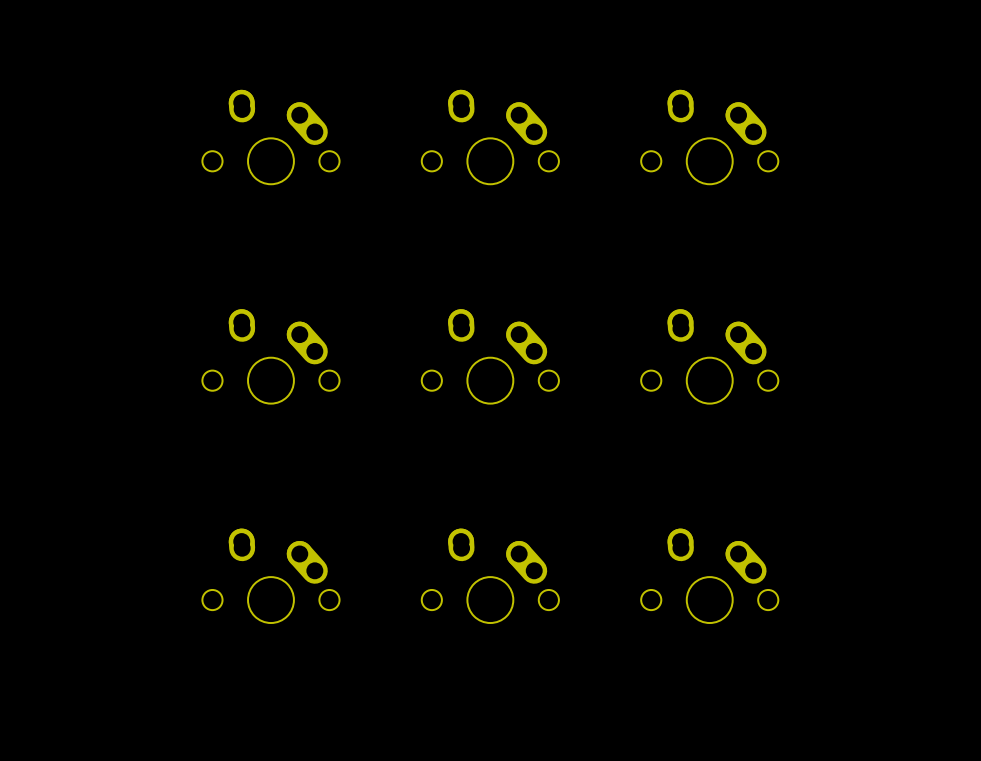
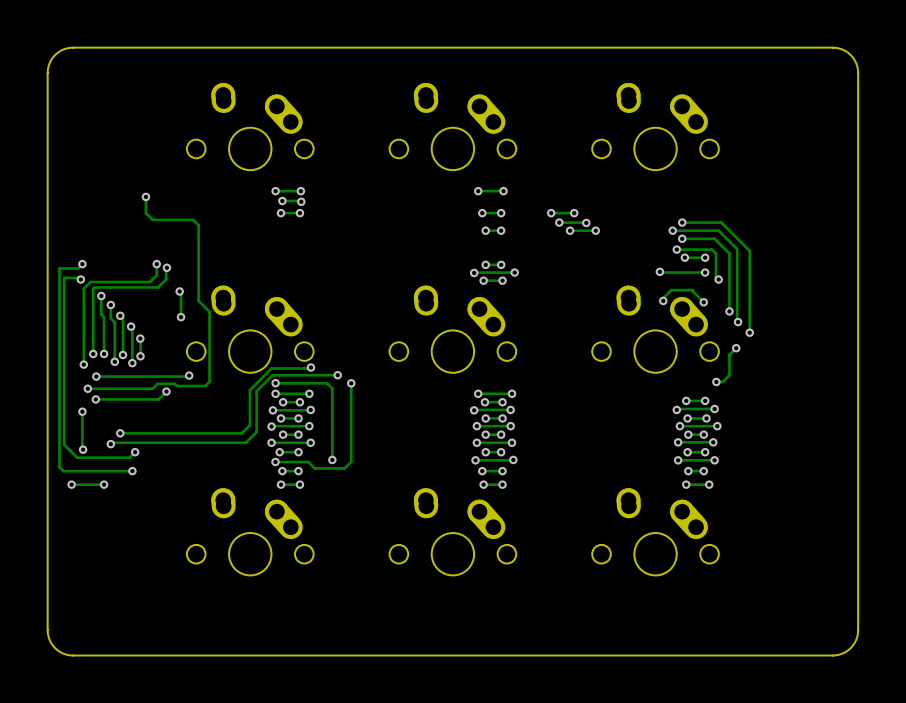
board edge: none -> (832, 47) (72, 47) (57, 52) (49, 63) (47, 72) (47, 630) (52, 645) (60, 652) (72, 655) (832, 655) (848, 650) (856, 639) (858, 630) (858, 72) (856, 63) (850, 55) (842, 49) (832, 47)
via: none -> (275, 191)
track: none -> (300, 191) (275, 191)
via: none -> (300, 191)
via: none -> (478, 191)
track: none -> (503, 191) (478, 191)
via: none -> (503, 191)
track: none -> (145, 196) (145, 213) (152, 219) (193, 219) (198, 225) (198, 300) (209, 311) (209, 381) (205, 386) (157, 383) (152, 388) (87, 388)
via: none -> (145, 196)
track: none -> (282, 200) (301, 201)
via: none -> (282, 200)
via: none -> (301, 201)
via: none -> (281, 213)
track: none -> (299, 213) (281, 213)
via: none -> (299, 213)
via: none -> (482, 213)
track: none -> (501, 213) (482, 213)
via: none -> (501, 213)
via: none -> (551, 213)
track: none -> (574, 213) (551, 213)
via: none -> (574, 213)
track: none -> (559, 222) (586, 222)
via: none -> (559, 222)
track: none -> (682, 222) (721, 222) (749, 250) (749, 332)
via: none -> (682, 222)
via: none -> (586, 222)
via: none -> (485, 230)
track: none -> (501, 230) (485, 230)
via: none -> (501, 230)
via: none -> (570, 230)
track: none -> (595, 230) (571, 230)
via: none -> (595, 230)
track: none -> (672, 230) (718, 230) (737, 249) (738, 322)
via: none -> (672, 230)
track: none -> (679, 238) (714, 238) (729, 253) (729, 311)
via: none -> (682, 238)
track: none -> (676, 249) (711, 249) (715, 253) (715, 276) (718, 279)
via: none -> (676, 249)
via: none -> (684, 257)
track: none -> (705, 257) (684, 257)
via: none -> (705, 257)
track: none -> (82, 264) (78, 268) (59, 268) (59, 467) (63, 471) (132, 471)
via: none -> (82, 264)
track: none -> (156, 264) (156, 275) (149, 282) (90, 282) (83, 288) (83, 364)
via: none -> (156, 264)
via: none -> (485, 264)
track: none -> (501, 264) (485, 264)
via: none -> (501, 264)
track: none -> (166, 267) (166, 279) (158, 287) (93, 288) (93, 353)
via: none -> (166, 267)
track: none -> (659, 271) (705, 272)
via: none -> (659, 271)
via: none -> (474, 272)
track: none -> (514, 272) (474, 272)
via: none -> (514, 272)
via: none -> (705, 272)
track: none -> (80, 279) (64, 277) (64, 444) (77, 457) (129, 457) (135, 452)
via: none -> (80, 279)
via: none -> (718, 279)
via: none -> (483, 280)
track: none -> (502, 280) (483, 280)
via: none -> (502, 280)
track: none -> (179, 291) (181, 317)
via: none -> (179, 291)
track: none -> (101, 296) (101, 314) (104, 317) (104, 353)
via: none -> (101, 296)
track: none -> (663, 300) (663, 298) (671, 290) (693, 290) (703, 302)
via: none -> (663, 300)
via: none -> (703, 302)
track: none -> (110, 304) (110, 318) (114, 322) (114, 361)
via: none -> (110, 304)
via: none -> (729, 311)
track: none -> (120, 315) (122, 318) (122, 354)
via: none -> (120, 315)
via: none -> (181, 317)
via: none -> (738, 322)
track: none -> (131, 326) (132, 363)
via: none -> (131, 326)
via: none -> (749, 332)
track: none -> (140, 338) (140, 356)
via: none -> (140, 338)
track: none -> (736, 348) (729, 354) (729, 375) (722, 381) (716, 381)
via: none -> (736, 348)
via: none -> (93, 353)
via: none -> (104, 353)
via: none -> (122, 354)
via: none -> (140, 356)
via: none -> (114, 361)
via: none -> (132, 363)
via: none -> (83, 364)
track: none -> (310, 367) (271, 368) (249, 390) (249, 425) (241, 433) (120, 433)
via: none -> (310, 367)
track: none -> (189, 375) (96, 376)
via: none -> (189, 375)
track: none -> (337, 375) (272, 375) (256, 391) (256, 431) (245, 442) (110, 444)
via: none -> (337, 375)
via: none -> (96, 376)
via: none -> (716, 381)
track: none -> (275, 383) (326, 383) (332, 388) (332, 459)
via: none -> (275, 383)
track: none -> (351, 383) (351, 461) (344, 468) (314, 468) (308, 462) (275, 462)
via: none -> (351, 383)
via: none -> (87, 388)
track: none -> (166, 391) (158, 399) (95, 399)
via: none -> (166, 391)
via: none -> (275, 393)
track: none -> (309, 393) (275, 393)
via: none -> (309, 393)
via: none -> (478, 393)
track: none -> (512, 393) (478, 393)
via: none -> (512, 393)
via: none -> (95, 399)
via: none -> (686, 400)
track: none -> (705, 400) (686, 400)
via: none -> (705, 400)
via: none -> (283, 402)
track: none -> (299, 402) (283, 402)
via: none -> (299, 402)
via: none -> (484, 402)
track: none -> (502, 402) (484, 402)
via: none -> (502, 402)
track: none -> (714, 409) (676, 409)
via: none -> (714, 409)
track: none -> (310, 409) (272, 410)
via: none -> (310, 409)
track: none -> (510, 409) (474, 410)
via: none -> (510, 409)
via: none -> (676, 409)
via: none -> (272, 410)
via: none -> (474, 410)
track: none -> (82, 411) (83, 449)
via: none -> (82, 411)
via: none -> (281, 418)
track: none -> (298, 418) (281, 418)
via: none -> (298, 418)
via: none -> (485, 418)
track: none -> (502, 418) (485, 418)
via: none -> (502, 418)
via: none -> (687, 418)
track: none -> (706, 418) (687, 418)
via: none -> (706, 418)
via: none -> (271, 426)
track: none -> (309, 426) (271, 426)
via: none -> (309, 426)
via: none -> (476, 426)
track: none -> (510, 426) (476, 426)
via: none -> (510, 426)
via: none -> (679, 426)
track: none -> (717, 426) (679, 426)
via: none -> (717, 426)
via: none -> (120, 433)
via: none -> (283, 434)
track: none -> (298, 434) (283, 434)
via: none -> (298, 434)
via: none -> (485, 434)
track: none -> (501, 434) (485, 434)
via: none -> (501, 434)
via: none -> (688, 434)
track: none -> (703, 434) (688, 434)
via: none -> (703, 434)
via: none -> (678, 442)
track: none -> (713, 442) (678, 442)
via: none -> (713, 442)
via: none -> (271, 442)
track: none -> (310, 442) (271, 442)
via: none -> (310, 442)
via: none -> (476, 442)
track: none -> (512, 442) (476, 442)
via: none -> (512, 442)
via: none -> (110, 444)
via: none -> (83, 449)
via: none -> (135, 452)
via: none -> (279, 452)
track: none -> (298, 452) (279, 452)
via: none -> (298, 452)
via: none -> (485, 452)
track: none -> (501, 452) (485, 452)
via: none -> (501, 452)
via: none -> (687, 452)
track: none -> (705, 452) (687, 452)
via: none -> (705, 452)
via: none -> (332, 459)
track: none -> (513, 459) (475, 460)
via: none -> (513, 459)
via: none -> (475, 460)
via: none -> (678, 460)
track: none -> (714, 460) (678, 460)
via: none -> (714, 460)
via: none -> (275, 462)
via: none -> (132, 471)
via: none -> (282, 471)
track: none -> (298, 471) (282, 471)
via: none -> (298, 471)
via: none -> (482, 471)
track: none -> (502, 471) (482, 471)
via: none -> (502, 471)
via: none -> (688, 471)
track: none -> (703, 471) (688, 471)
via: none -> (703, 471)
via: none -> (71, 484)
track: none -> (104, 484) (71, 484)
via: none -> (104, 484)
via: none -> (281, 484)
track: none -> (299, 484) (281, 484)
via: none -> (299, 484)
via: none -> (483, 484)
track: none -> (502, 484) (483, 484)
via: none -> (502, 484)
via: none -> (686, 484)
track: none -> (709, 484) (686, 484)
via: none -> (709, 484)

